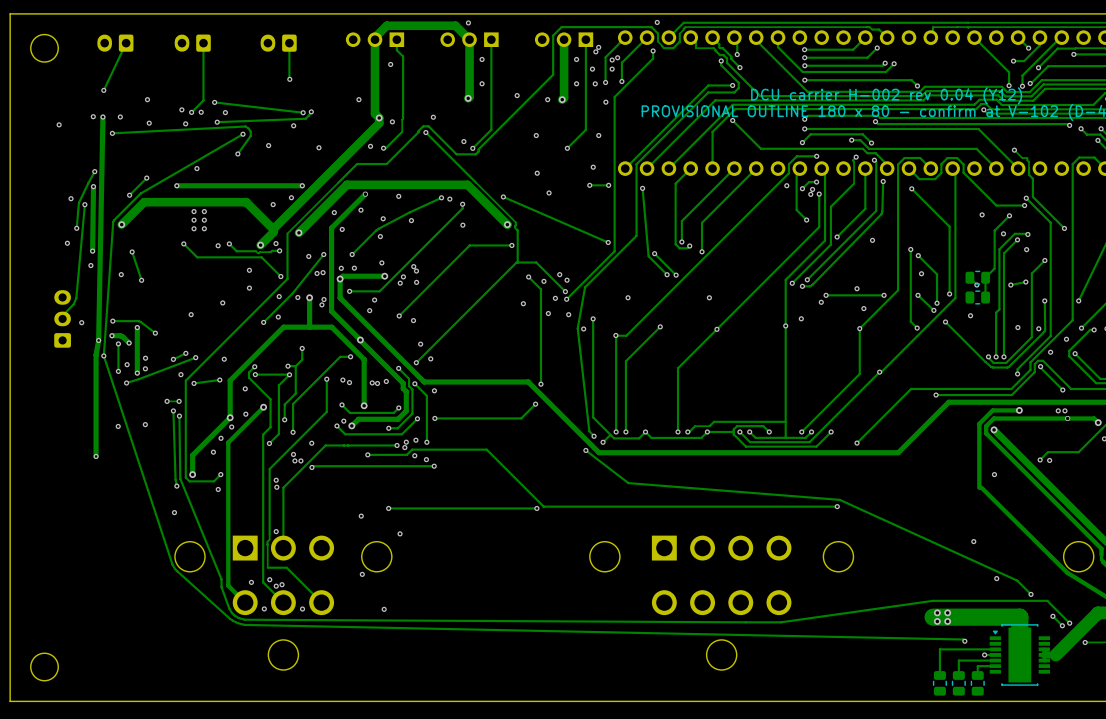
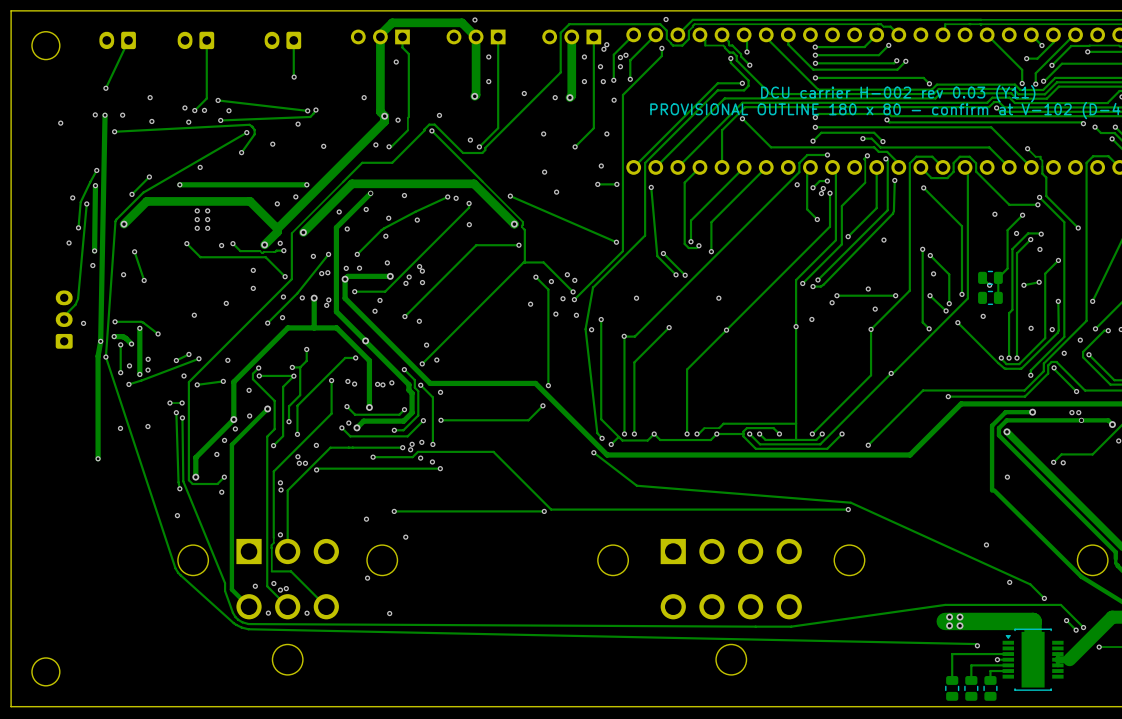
text: DCU carrier H-002 rev 0.04 (Y12) (886, 95) -> DCU carrier H-002 rev 0.03 (Y11) (898, 93)

